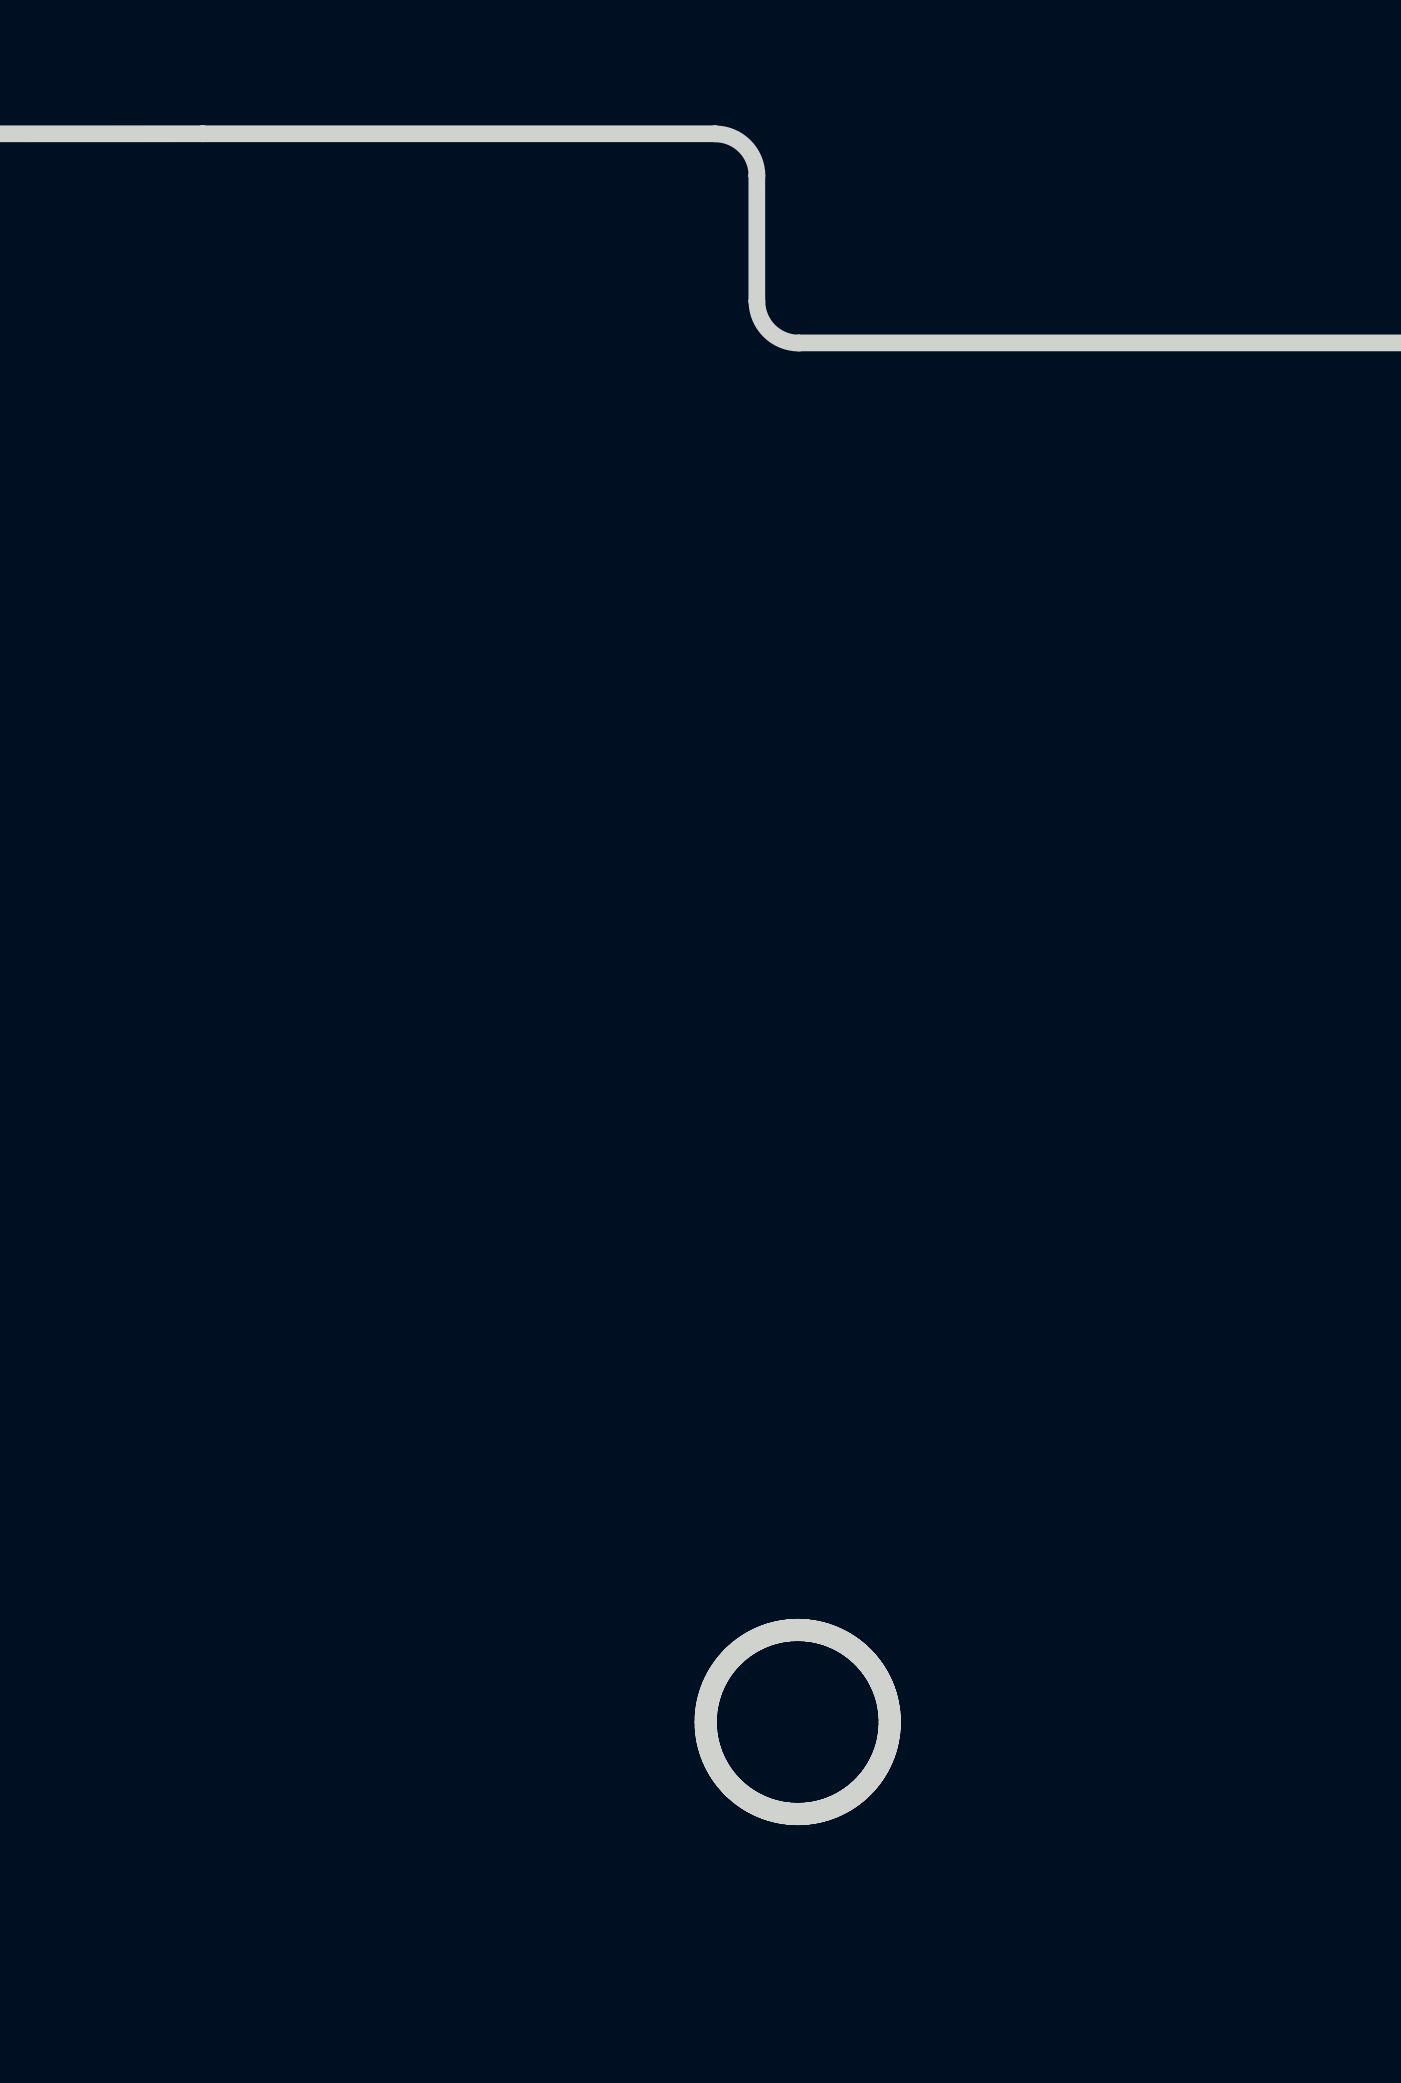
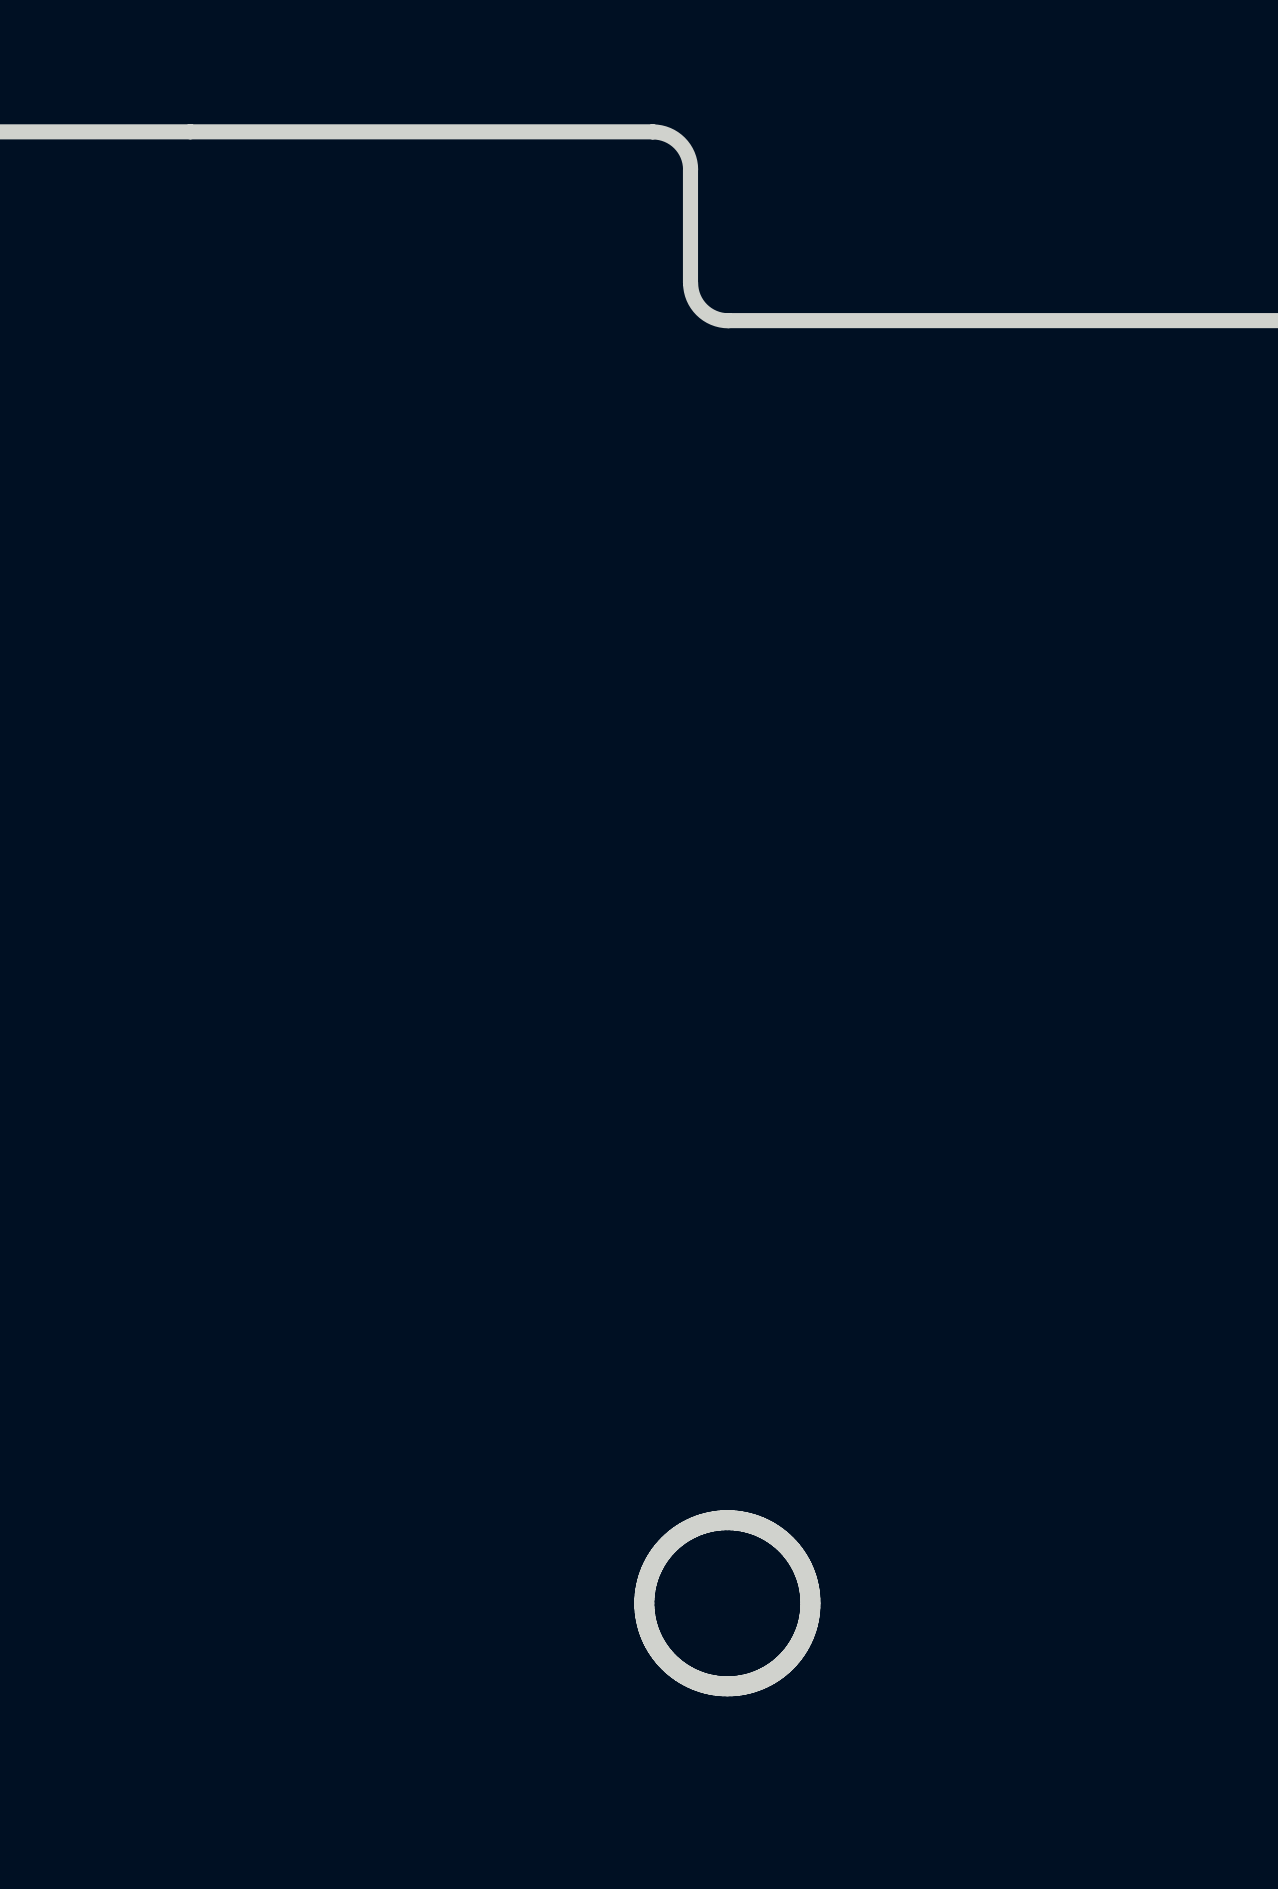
board edge: (792, 1630) (774, 1632) (757, 1639) (742, 1648) (729, 1660) (718, 1674) (711, 1690) (706, 1707) (705, 1726) (708, 1745) (714, 1761) (723, 1777) (735, 1790) (749, 1800) (766, 1808) (783, 1812) (802, 1813) (820, 1811) (837, 1804) (852, 1795) (865, 1783) (876, 1769) (884, 1753) (888, 1736) (889, 1717) (886, 1699) (880, 1682) (871, 1666) (859, 1653) (845, 1643) (829, 1635) (811, 1631) (792, 1630) -> (723, 1520) (706, 1522) (691, 1528) (677, 1536) (665, 1547) (656, 1560) (649, 1574) (645, 1590) (644, 1607) (646, 1624) (652, 1639) (660, 1653) (671, 1664) (684, 1674) (698, 1681) (714, 1685) (731, 1686) (748, 1683) (763, 1678) (777, 1669) (788, 1659) (798, 1646) (805, 1631) (809, 1615) (810, 1599) (807, 1582) (802, 1567) (793, 1553) (783, 1541) (770, 1532) (755, 1525) (740, 1521) (723, 1520)

